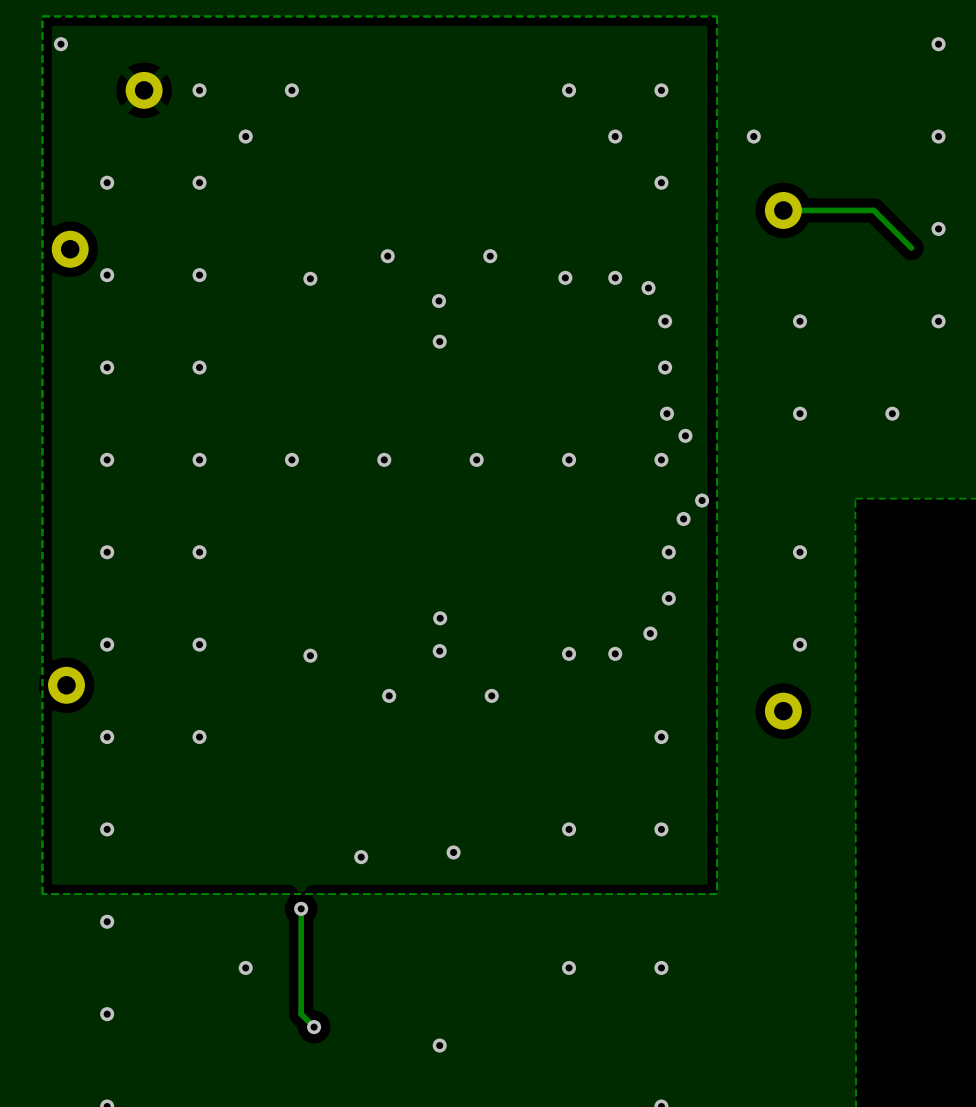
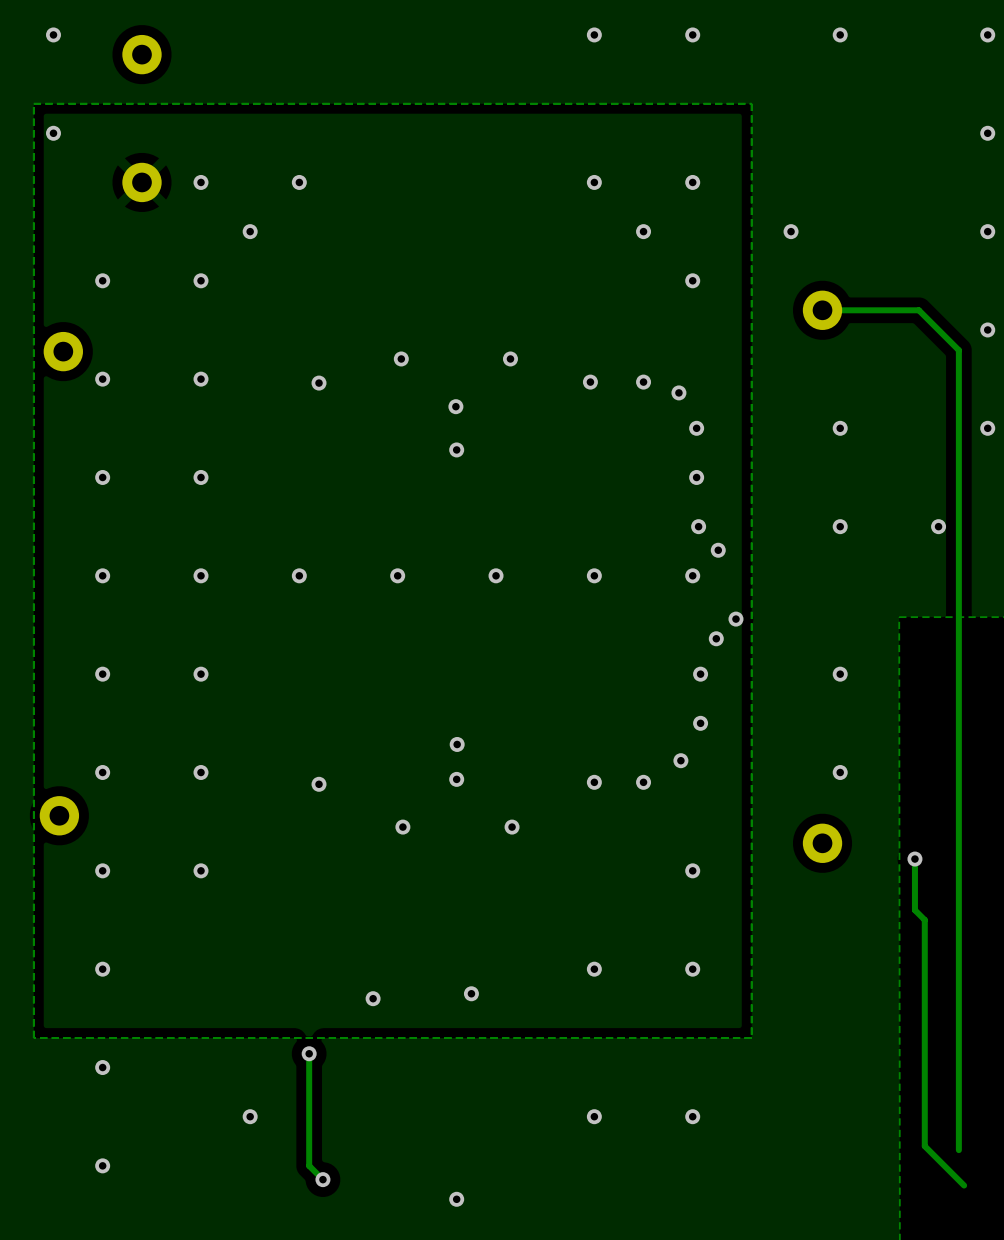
track: none -> (958, 350) (958, 1150)
track: none -> (914, 859) (914, 910) (924, 920) (924, 1146) (964, 1185)
via: none -> (914, 859)

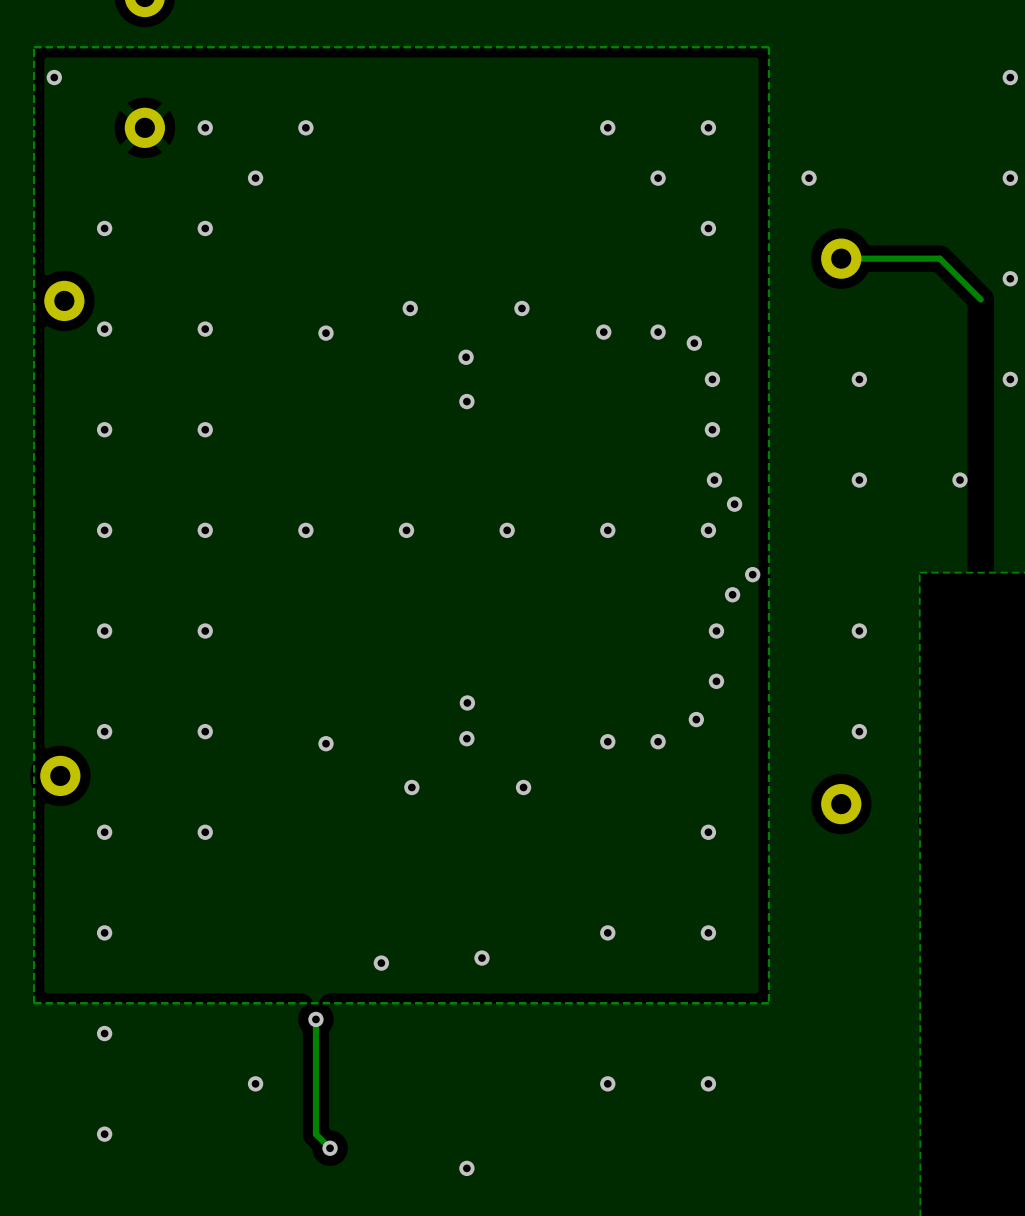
track: (958, 350) (958, 1150) -> none
track: (914, 859) (914, 910) (924, 920) (924, 1146) (964, 1185) -> none
via: (914, 859) -> none

